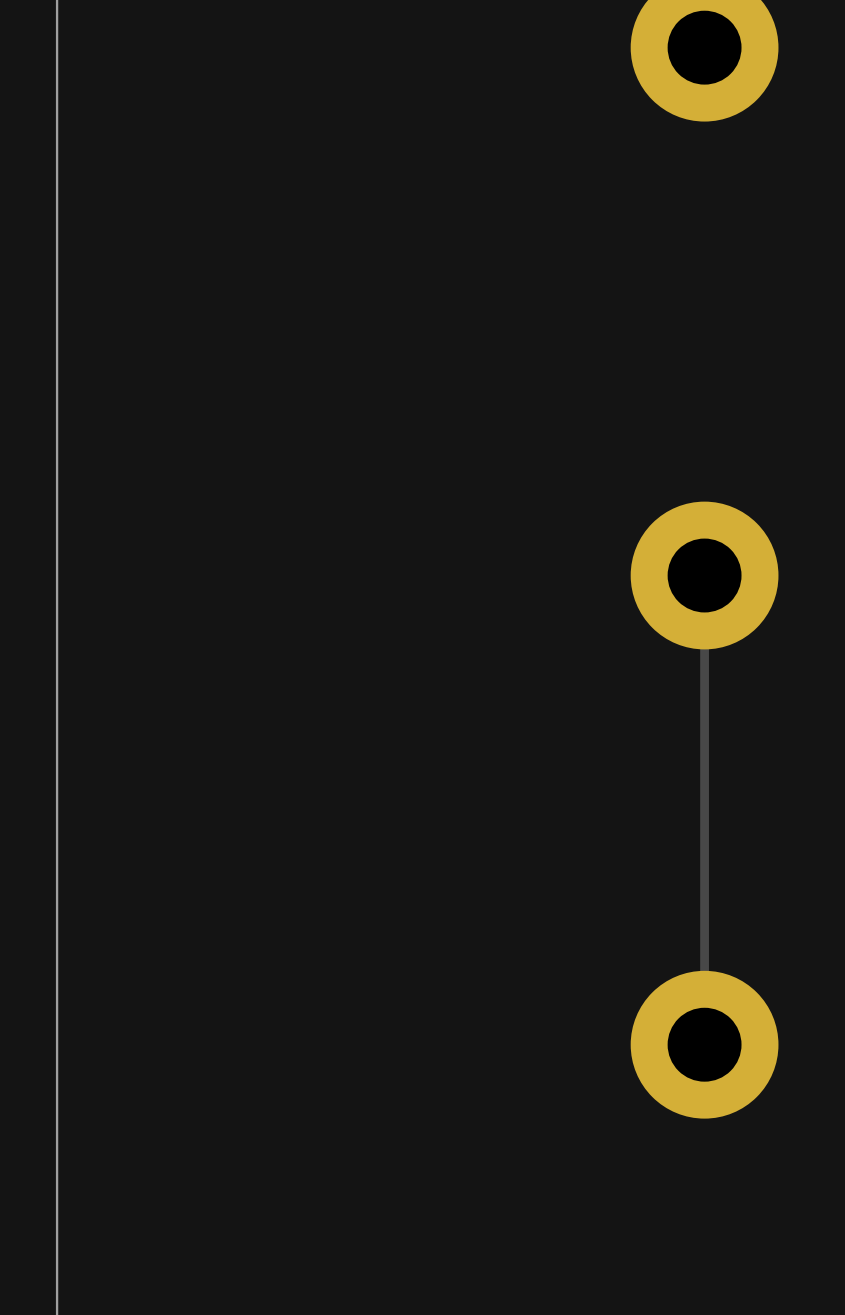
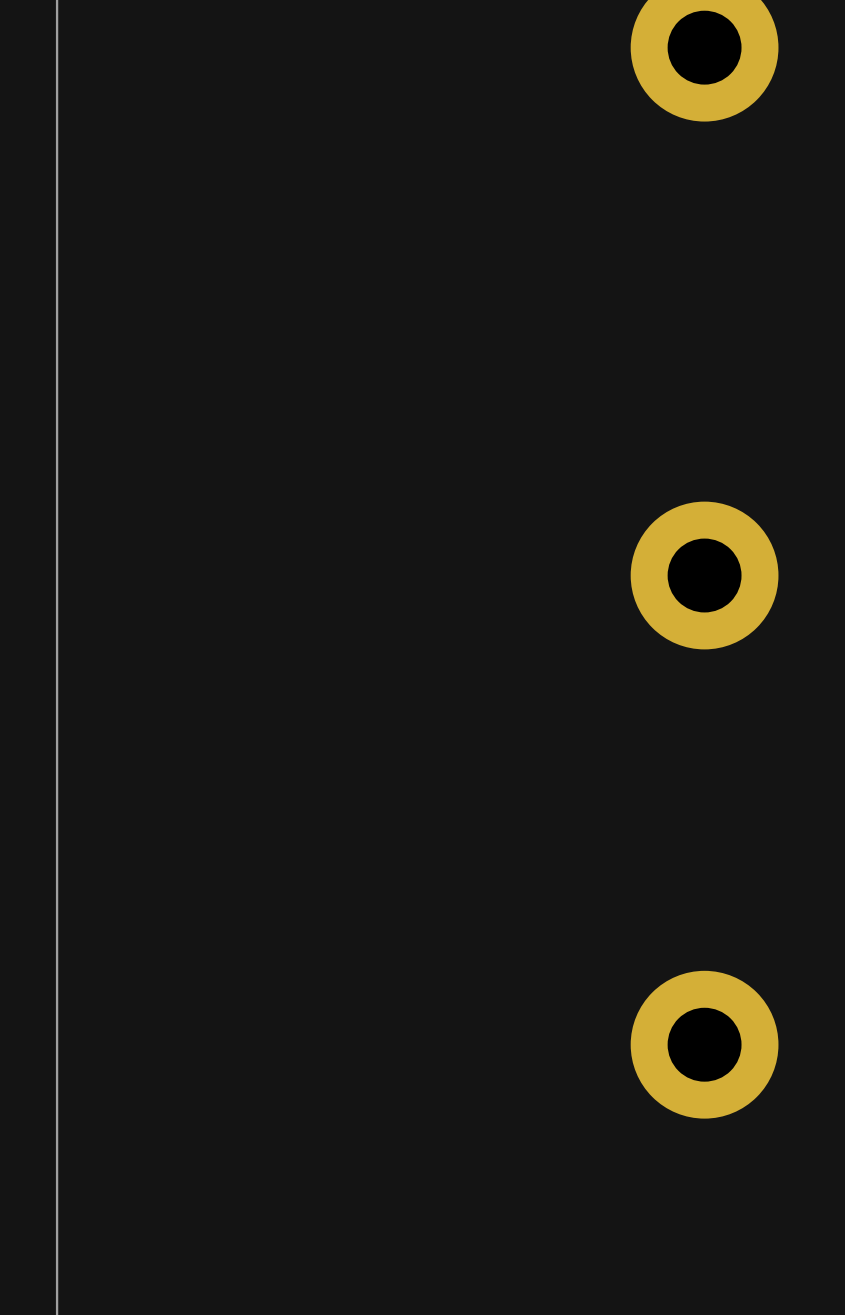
track: (704, 575) (704, 1044) -> none

